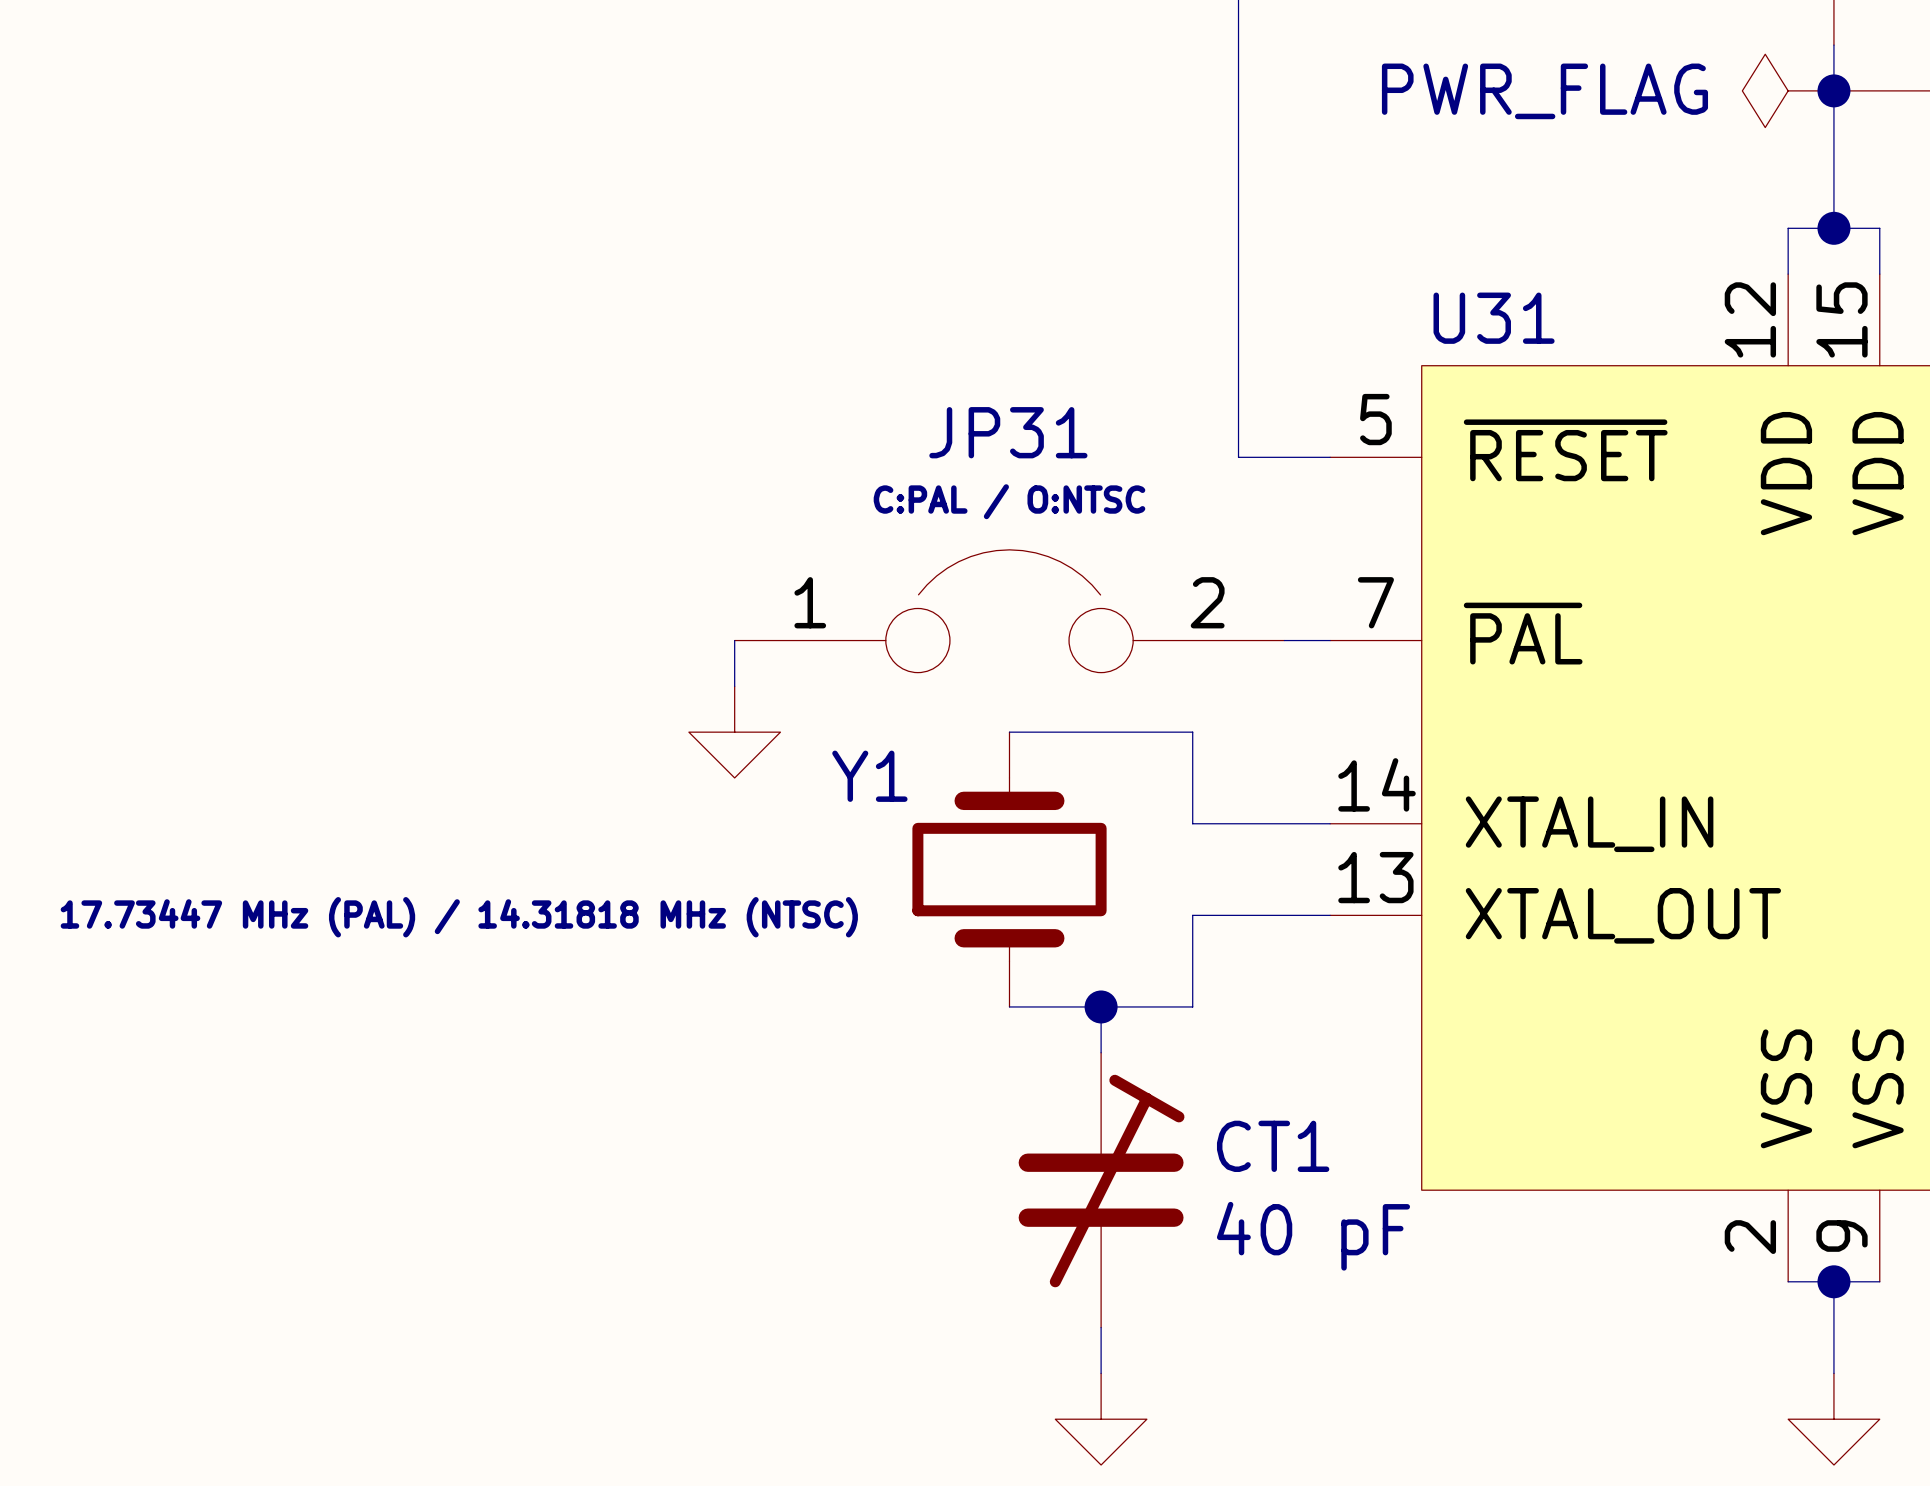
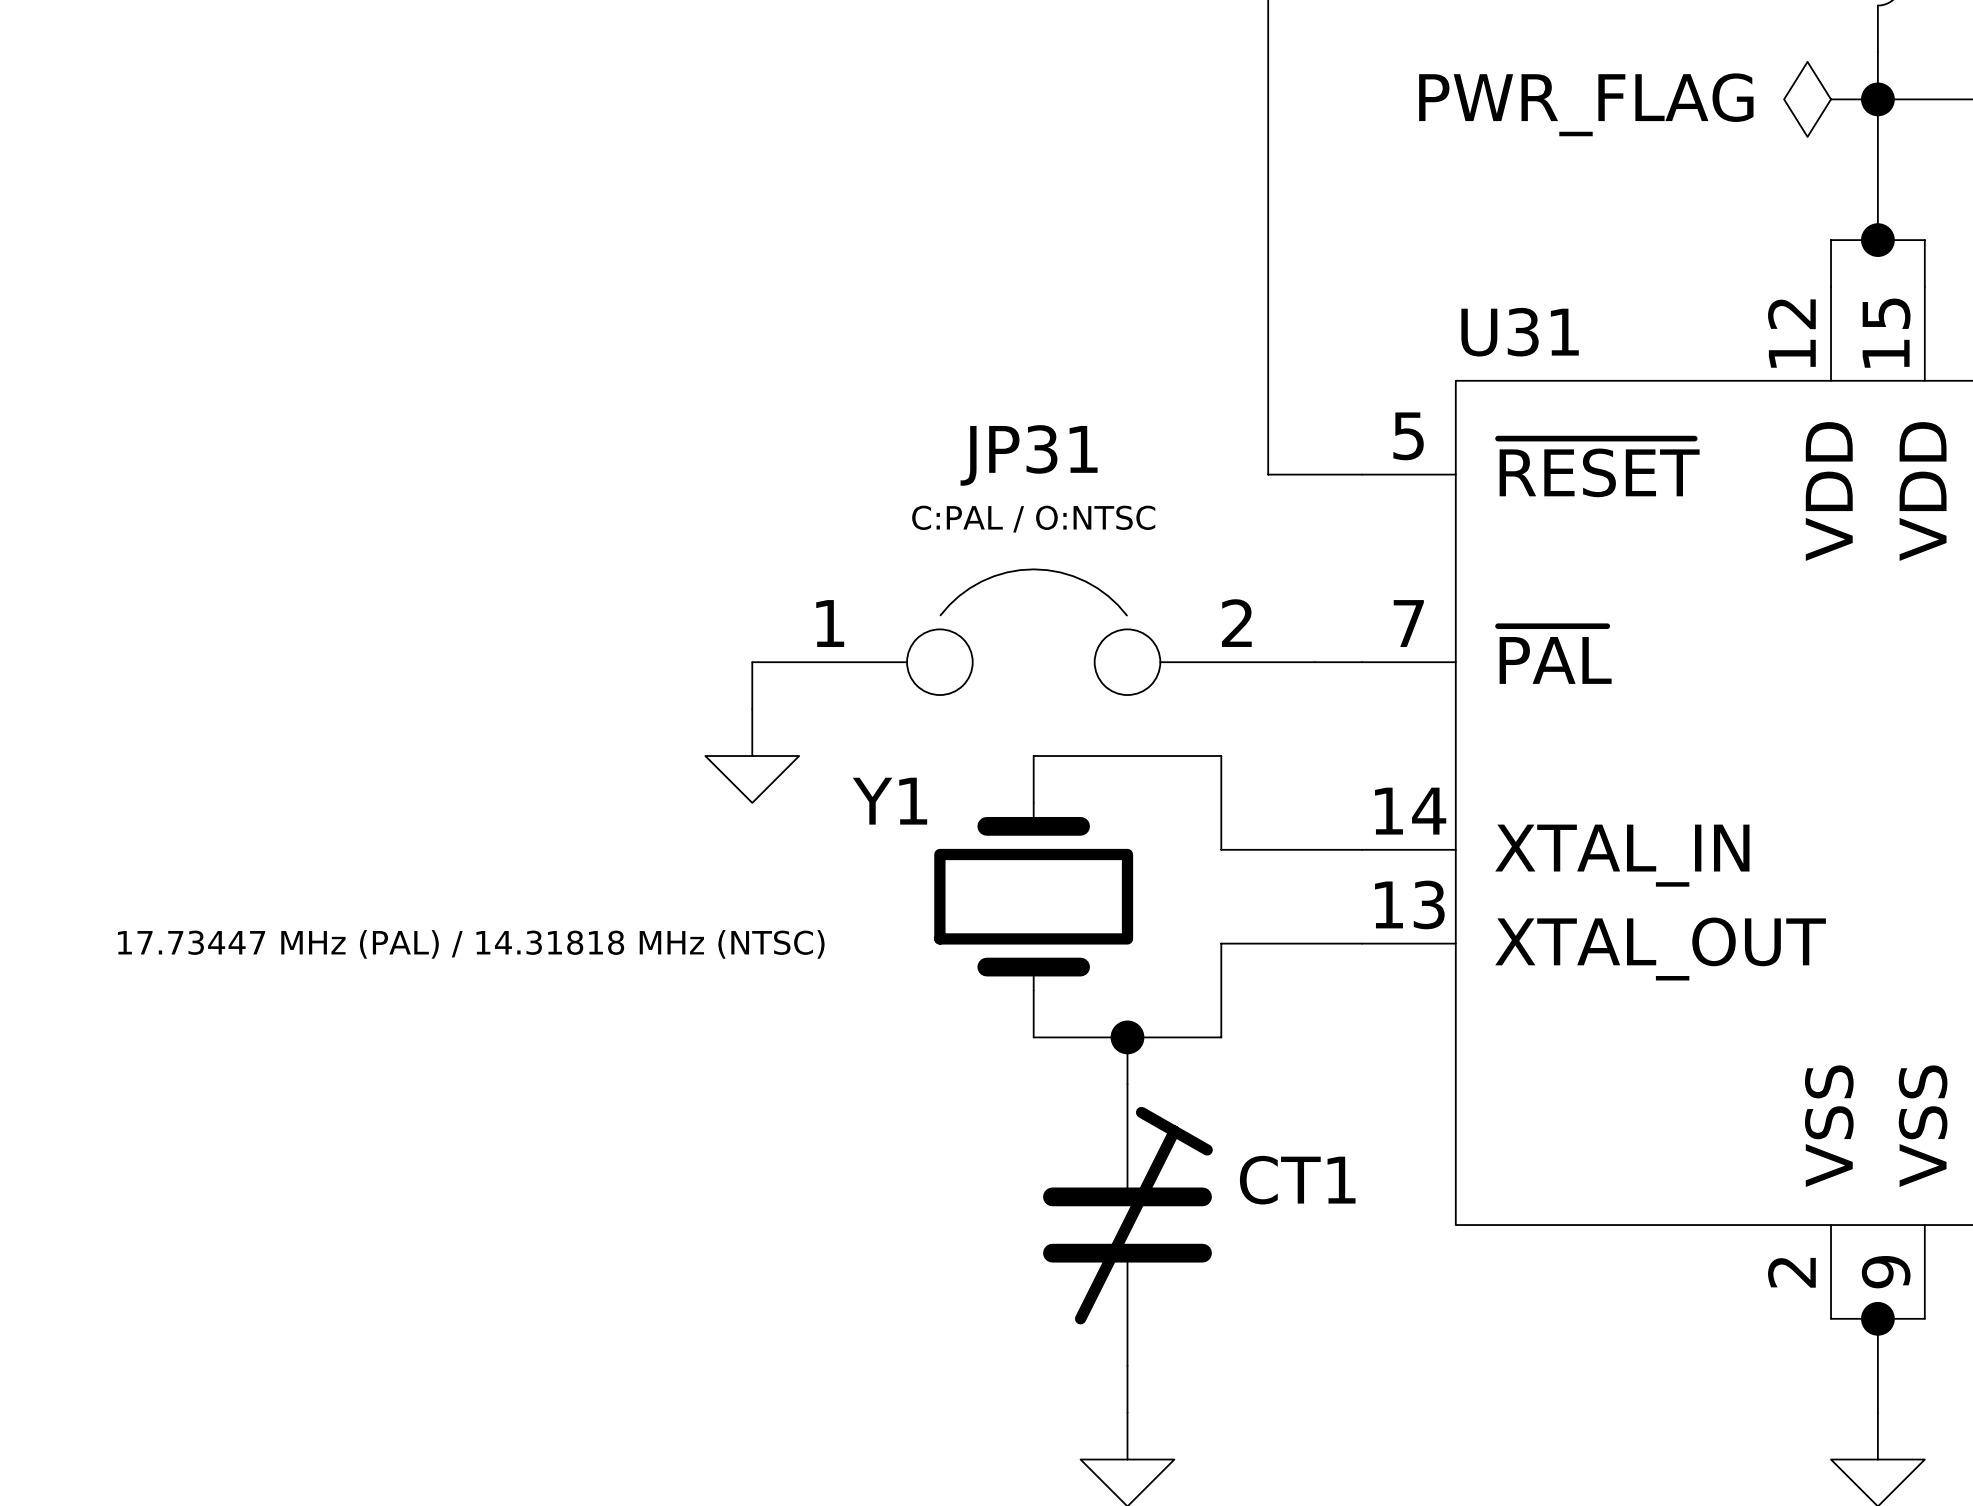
CT1 value: 40 pF (1313, 1236) -> none

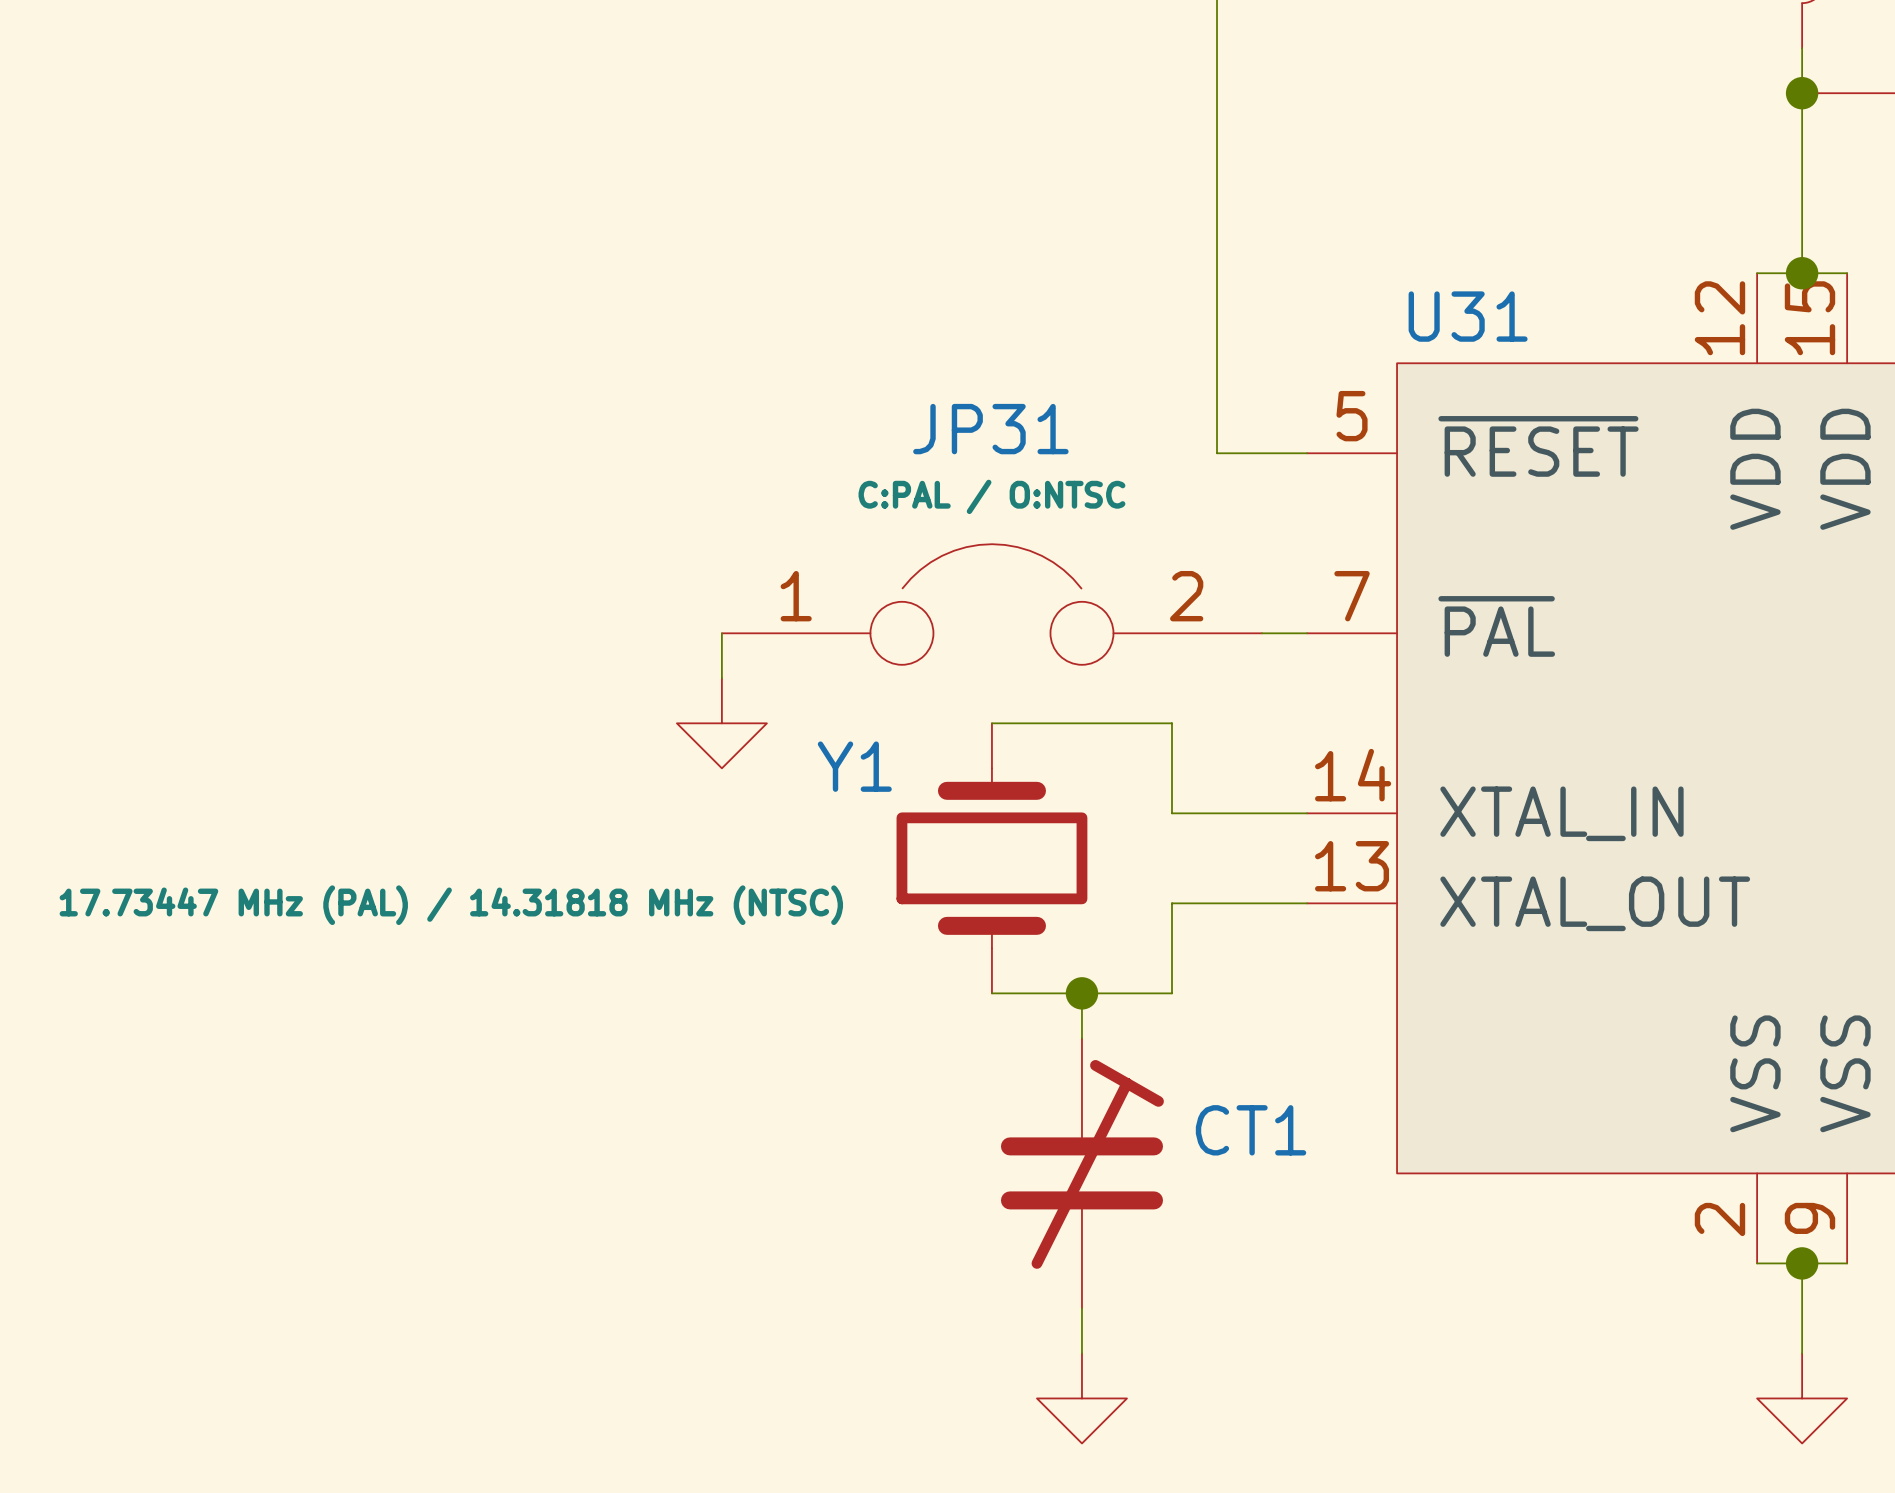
power symbol: PWR_FLAG (1831, 99) -> none
wire: none -> (1802, 228) (1802, 273)
junction position: (1877, 240) -> (1802, 273)
wire: (1831, 286) (1831, 240) (1924, 240) (1924, 286) -> (1757, 273) (1847, 273)

